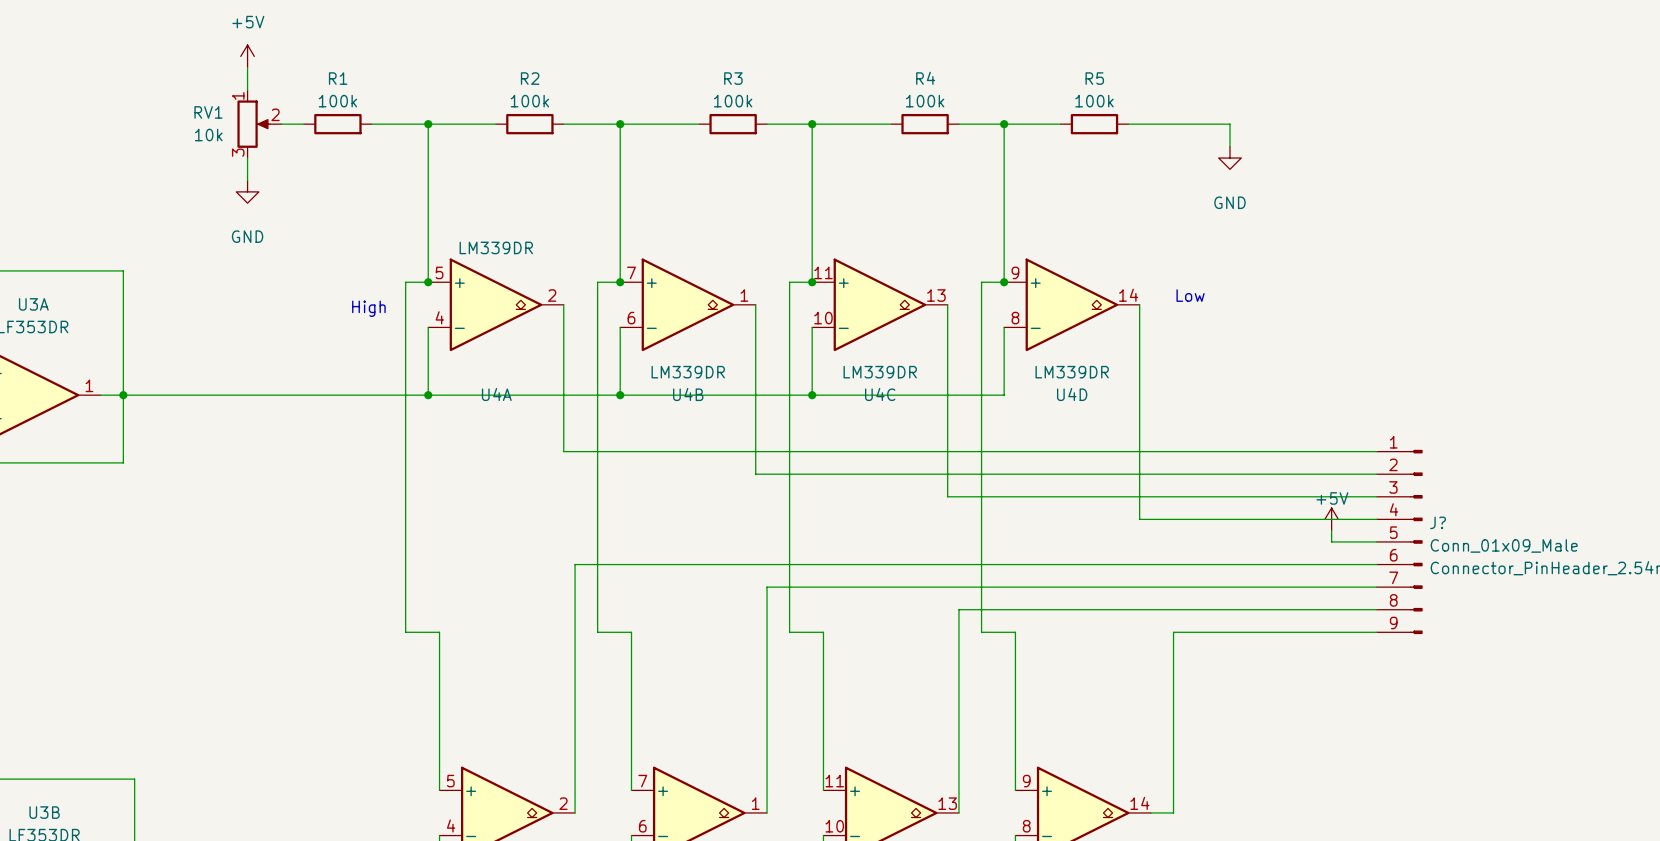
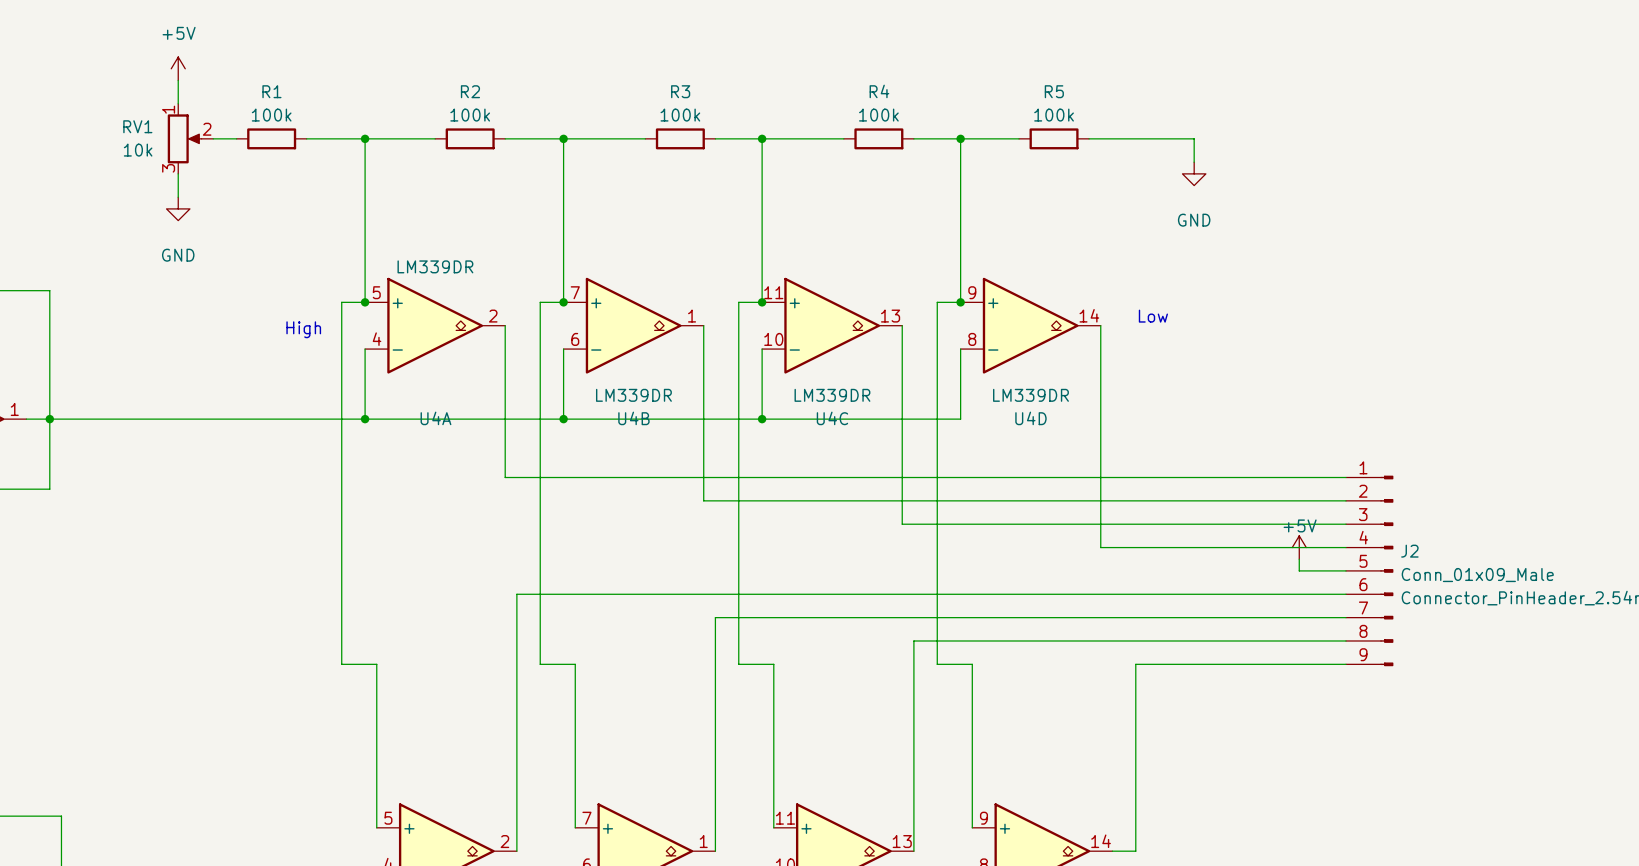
J? name: J? (1438, 522) -> J2 (1409, 551)

